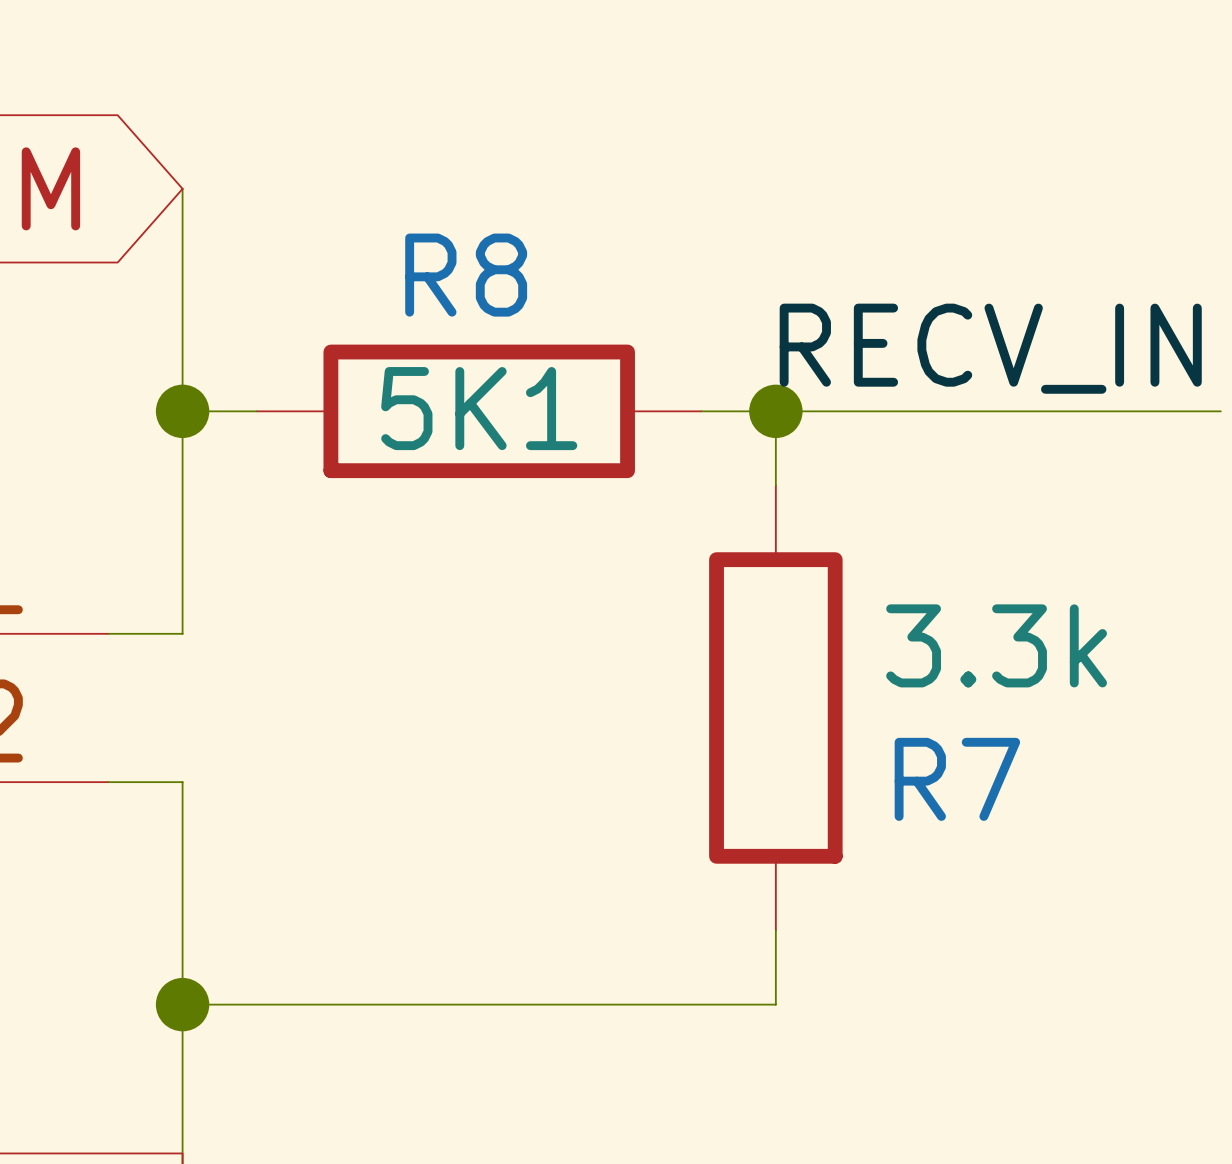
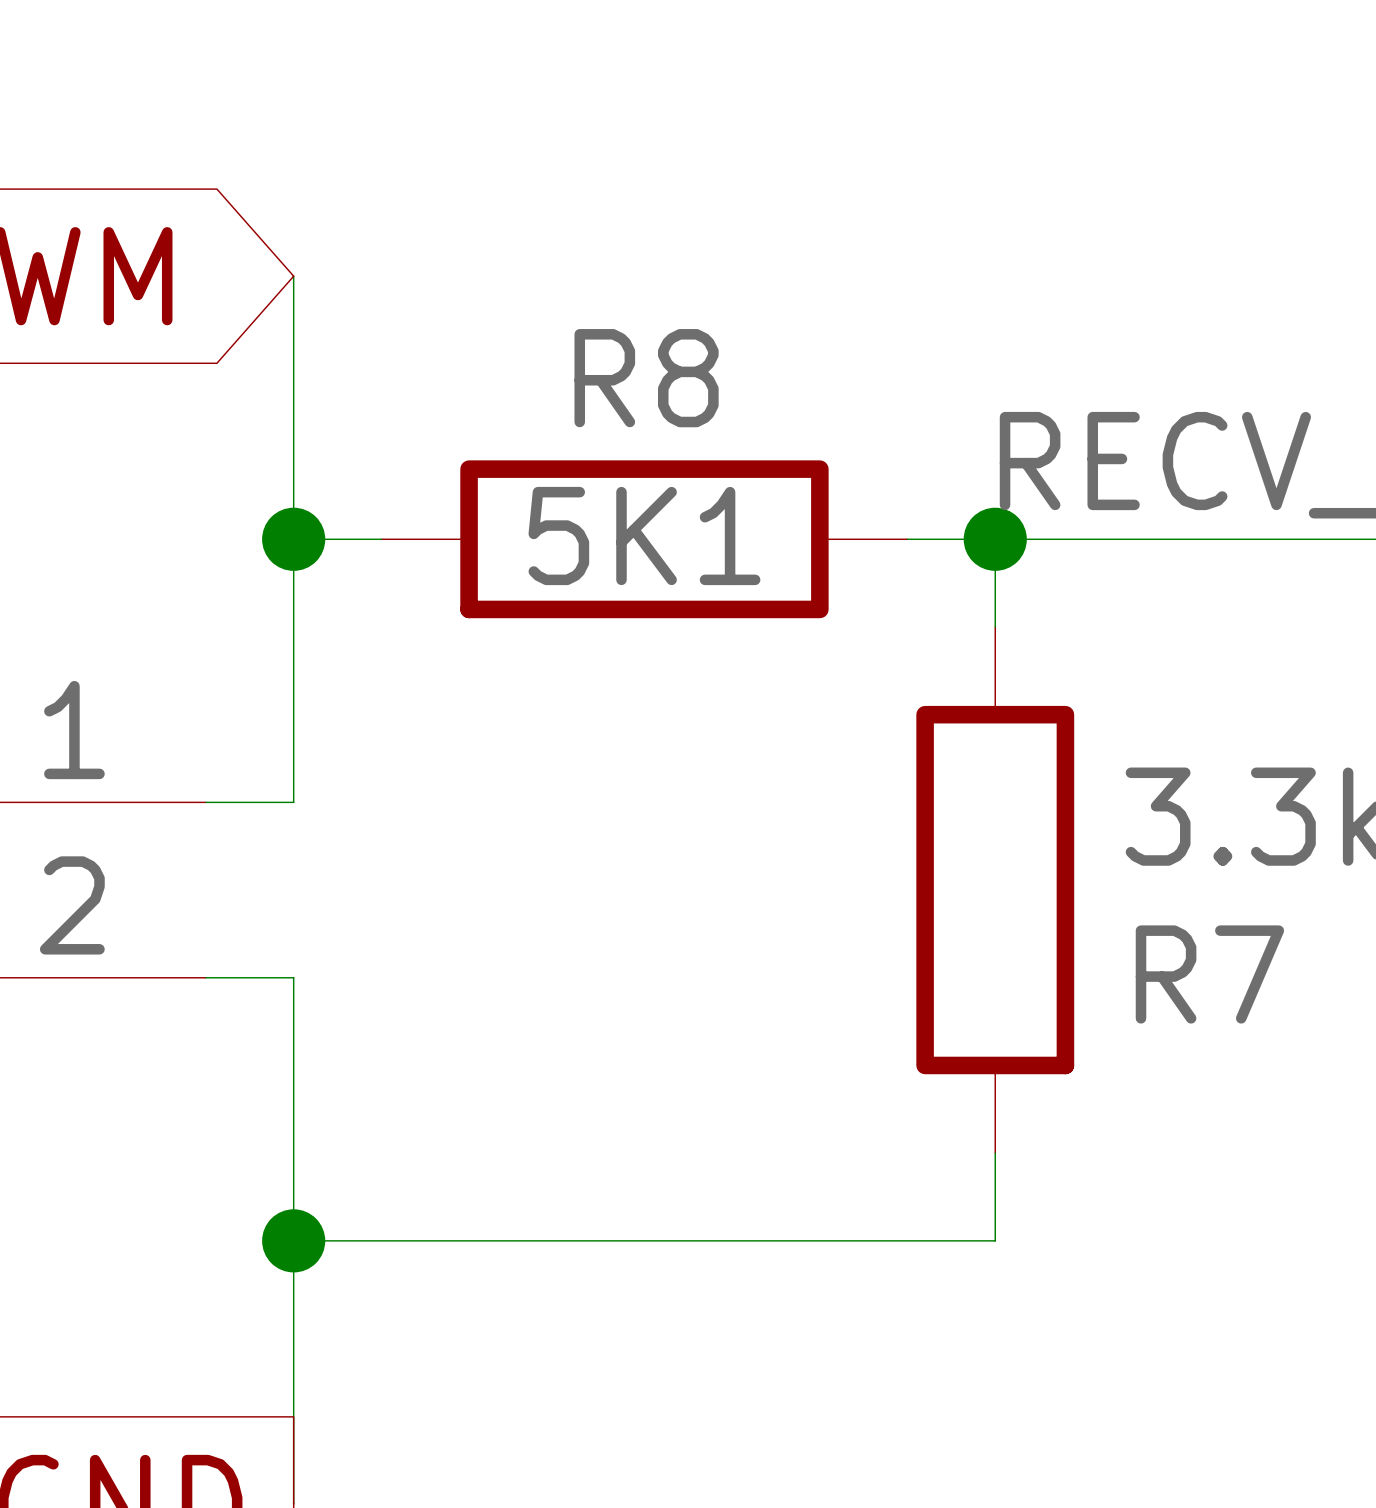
R8 name position: R8 (466, 275) -> R8 (646, 378)

